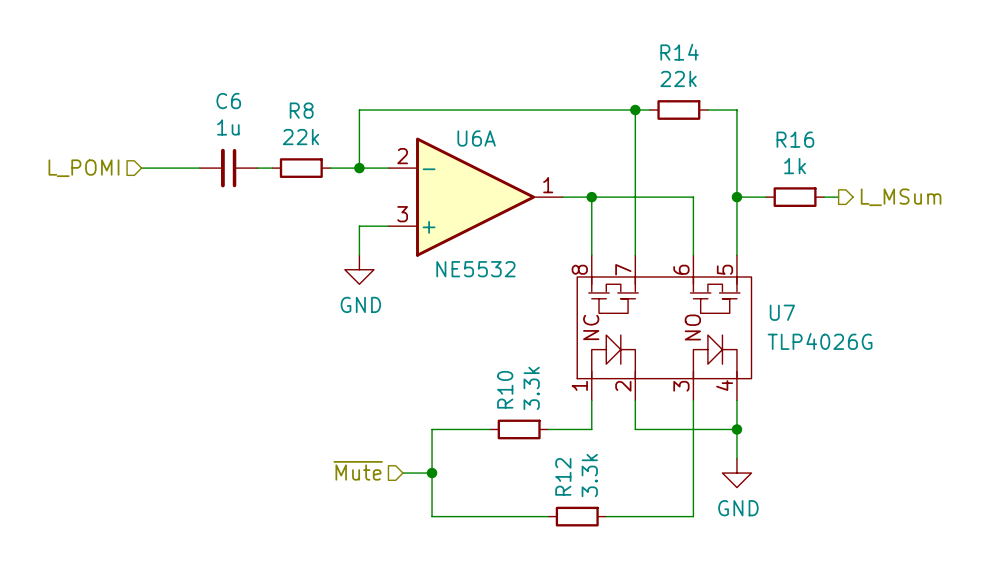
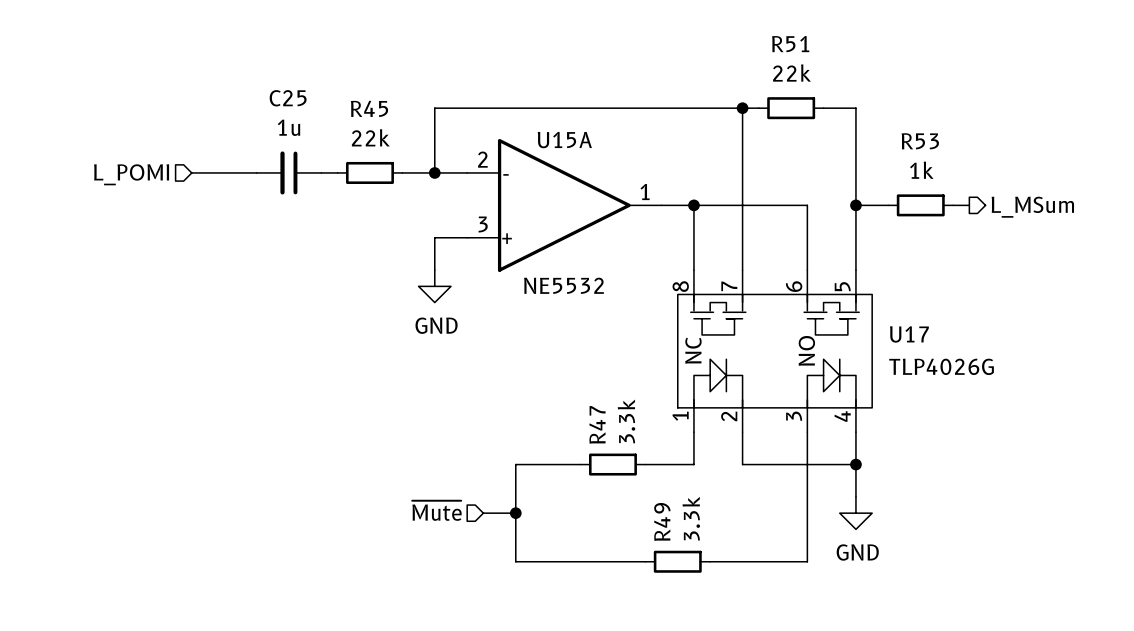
R14 name: R14 (679, 52) -> R51 (790, 44)
C6 name: C6 (228, 101) -> C25 (288, 98)
R8 name: R8 (301, 110) -> R45 (369, 108)
U6A name: U6A (476, 138) -> U15A (564, 140)
R16 name: R16 (795, 139) -> R53 (920, 141)
U7 name: U7 (782, 312) -> U17 (909, 334)
R10 name: R10 (505, 389) -> R47 (597, 424)
R12 name: R12 (563, 476) -> R49 (662, 521)

